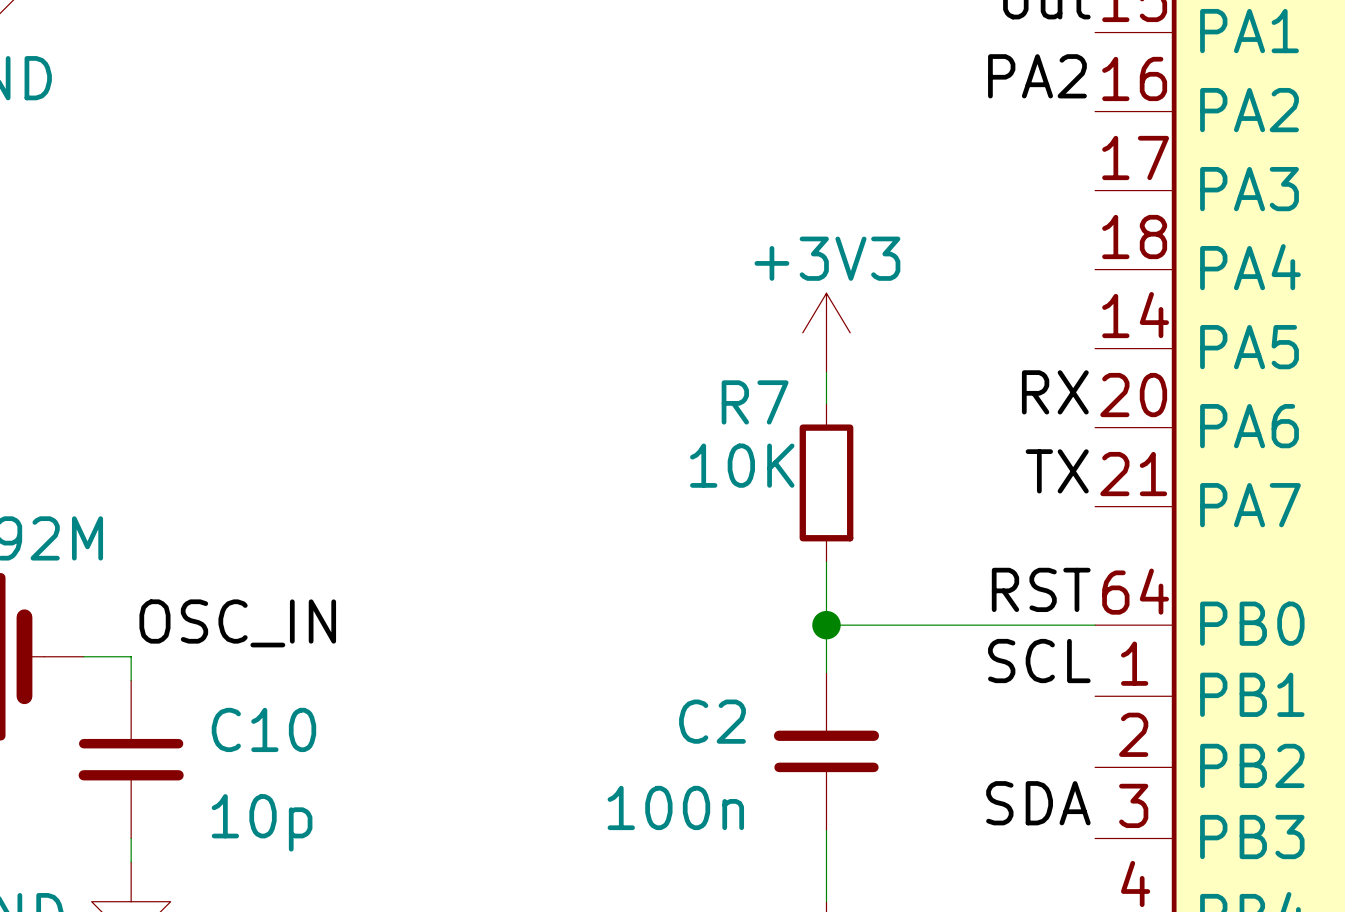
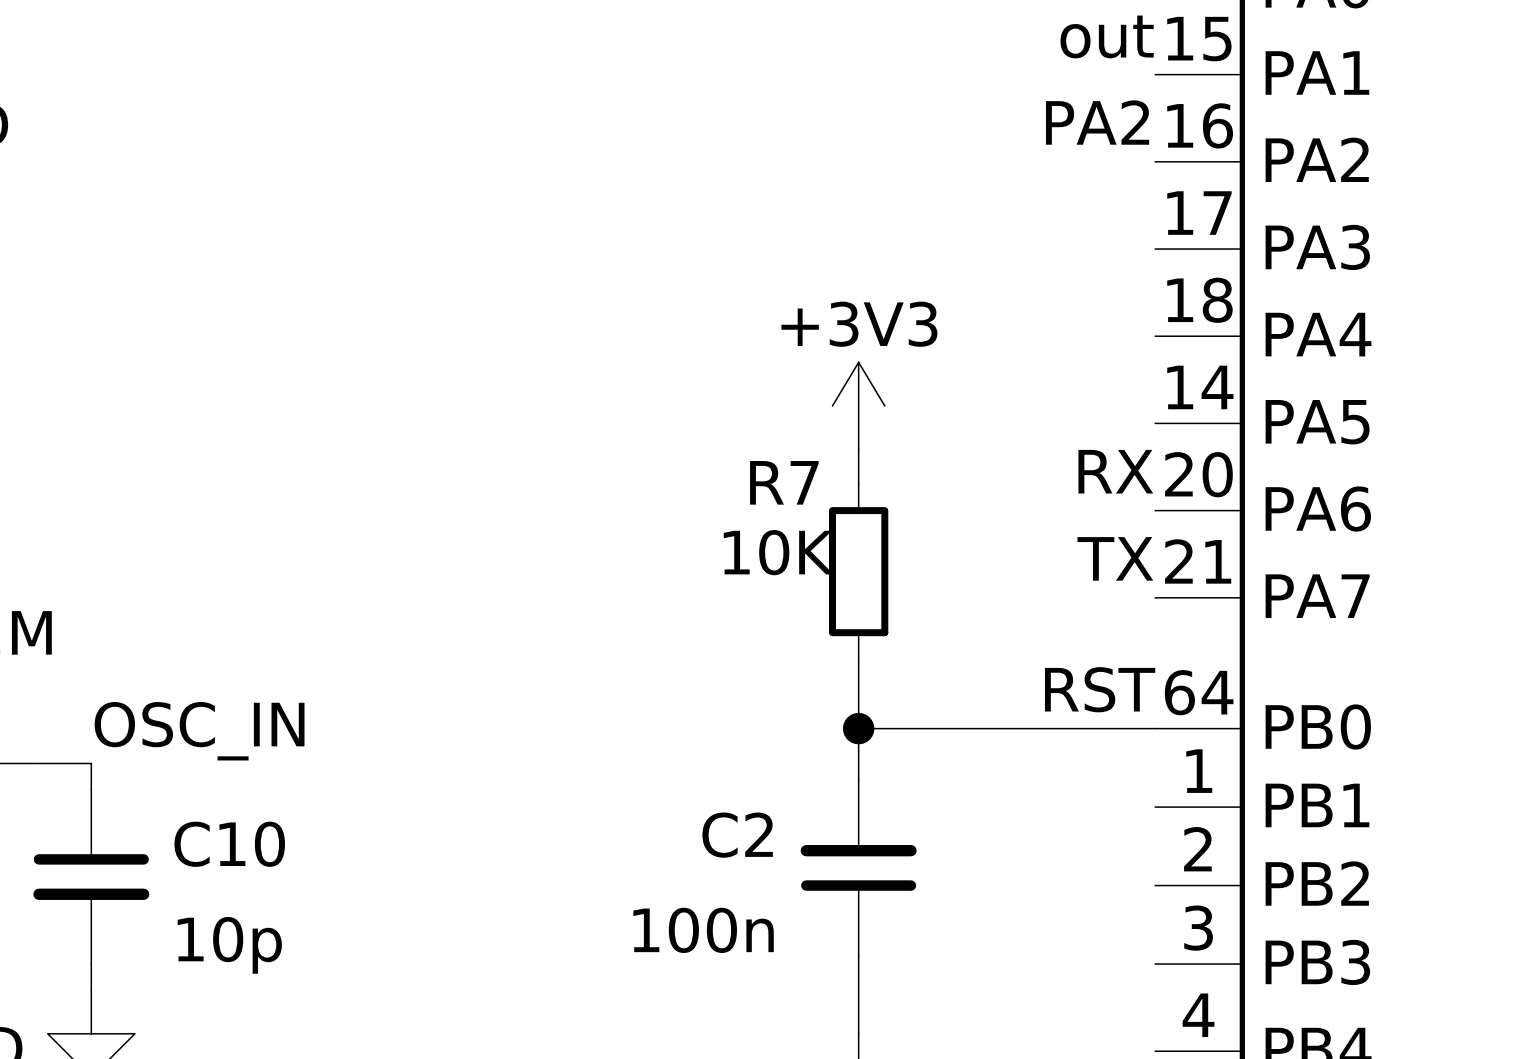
label: SCL (1039, 661) -> none
label: SDA (1038, 803) -> none

